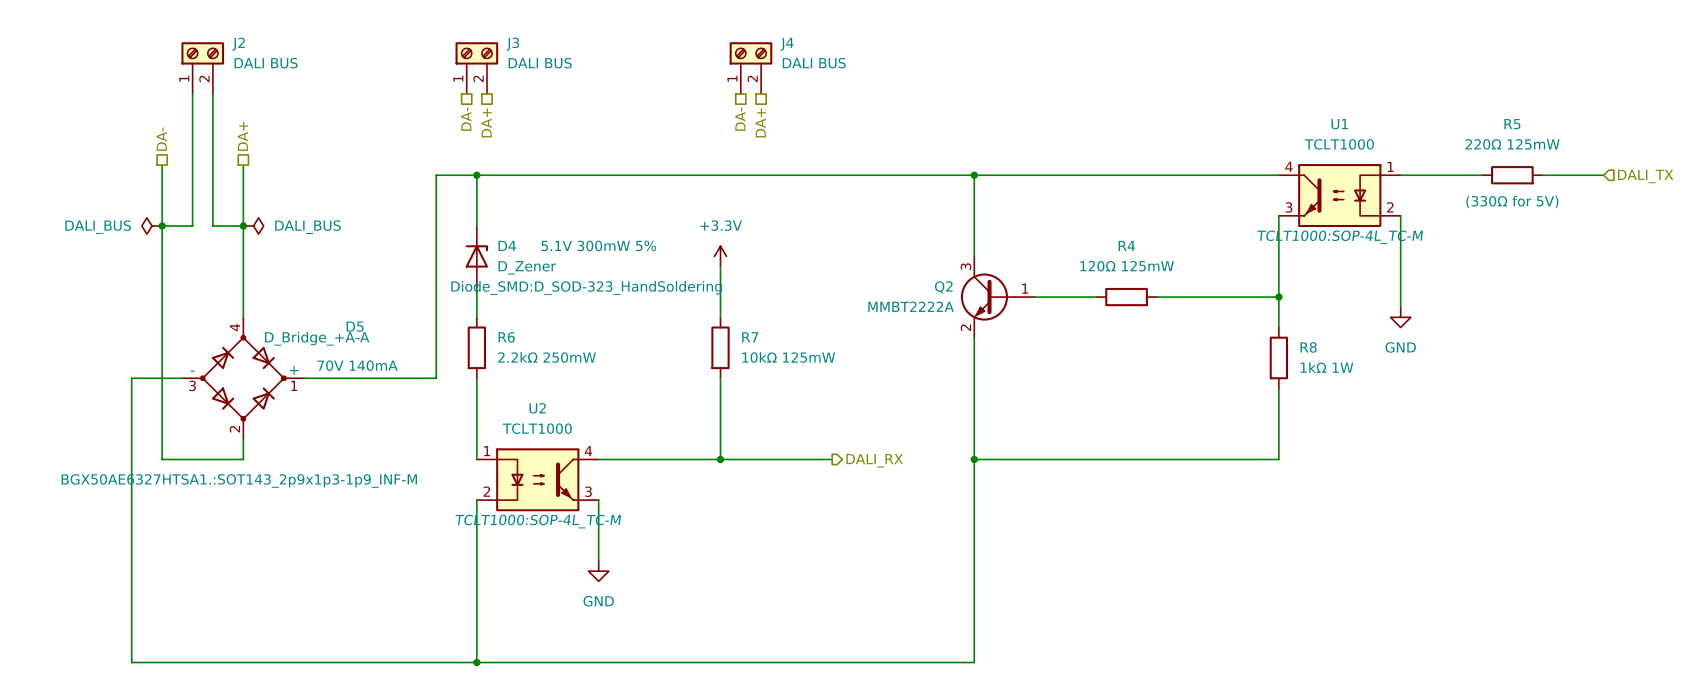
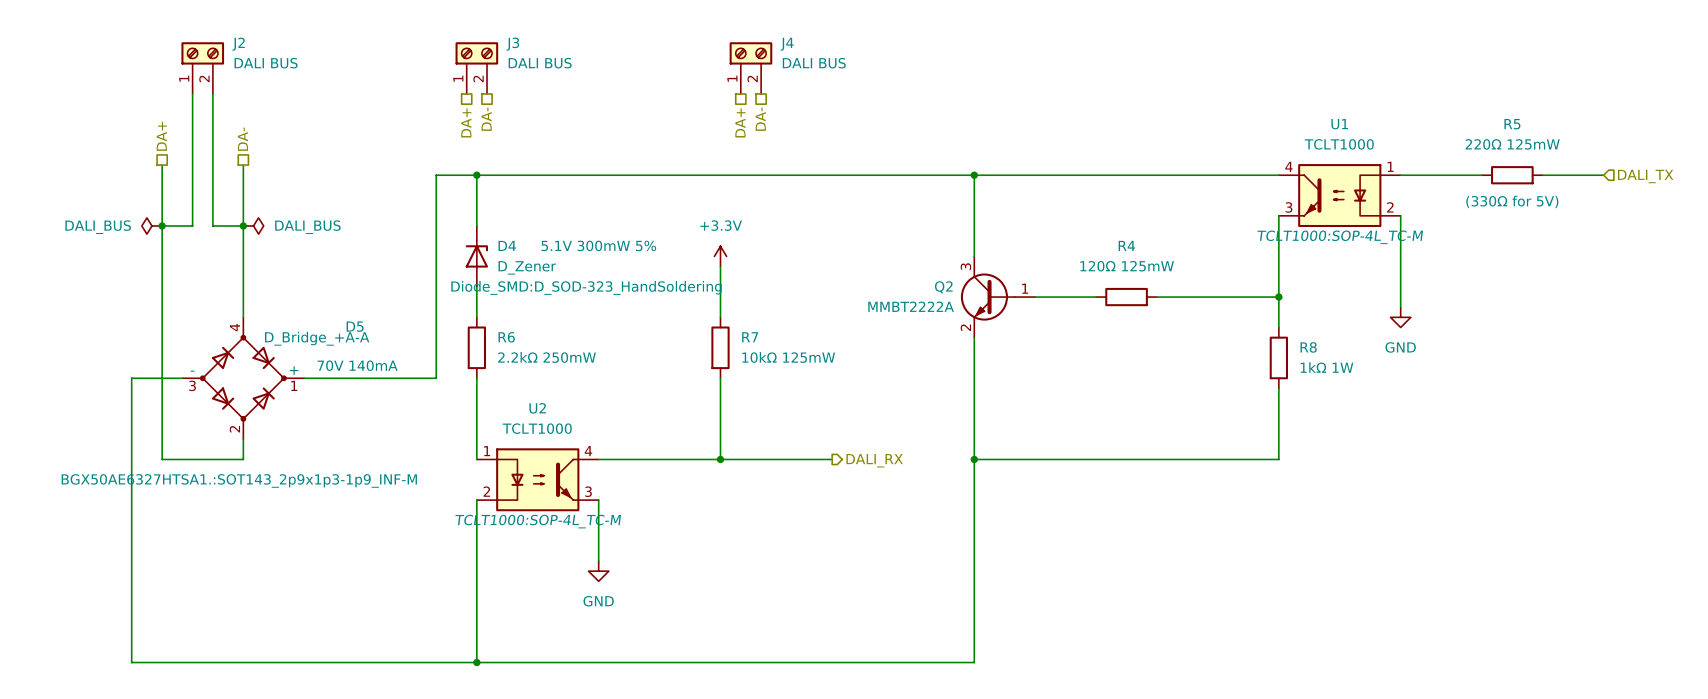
hierarchical label: DA- (466, 119) -> DA+ (466, 122)
hierarchical label: DA- (740, 119) -> DA+ (740, 122)
hierarchical label: DA+ (486, 122) -> DA- (486, 119)
hierarchical label: DA+ (760, 122) -> DA- (760, 119)
hierarchical label: DA+ (242, 136) -> DA- (242, 139)
hierarchical label: DA- (161, 139) -> DA+ (161, 136)

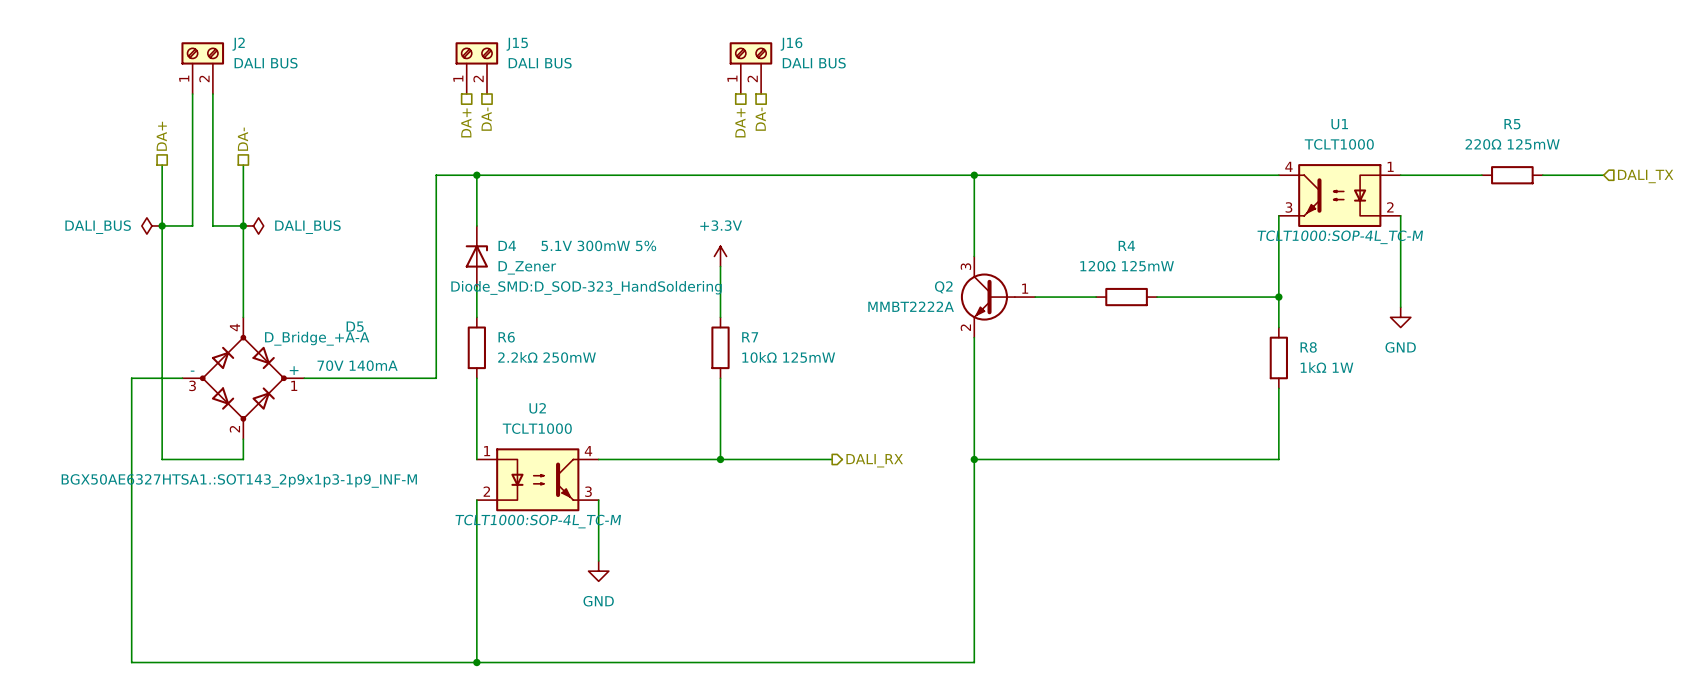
J3 name: J3 (512, 44) -> J15 (517, 44)
J4 name: J4 (787, 44) -> J16 (791, 44)
R5 text: (330Ω for 5V) (1512, 201) -> none

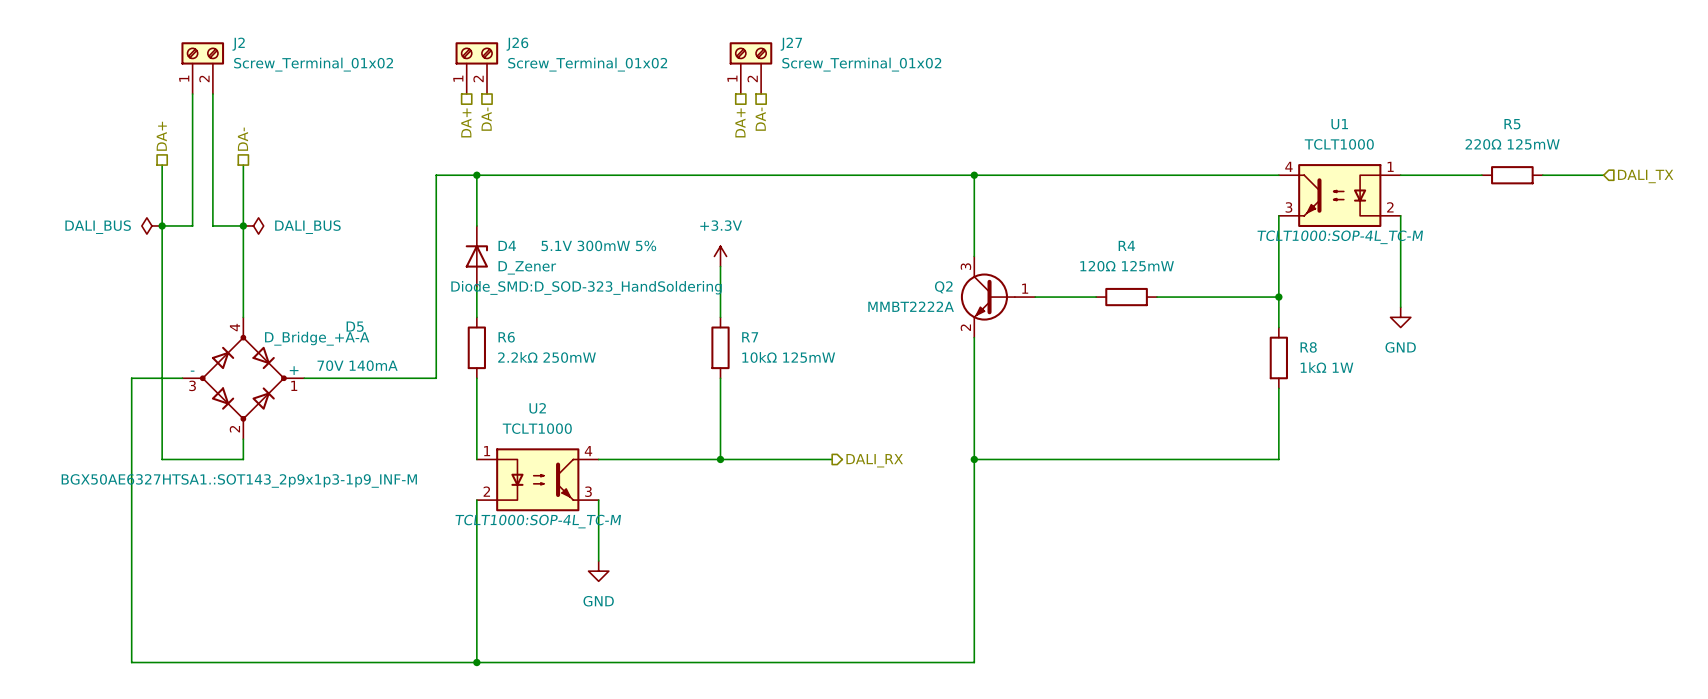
J15 name: J15 (517, 44) -> J26 (517, 44)
J16 name: J16 (791, 44) -> J27 (791, 44)
J2 value: DALI BUS (266, 63) -> Screw_Terminal_01x02 (313, 64)
J15 value: DALI BUS (540, 63) -> Screw_Terminal_01x02 (587, 64)
J16 value: DALI BUS (814, 63) -> Screw_Terminal_01x02 (861, 64)

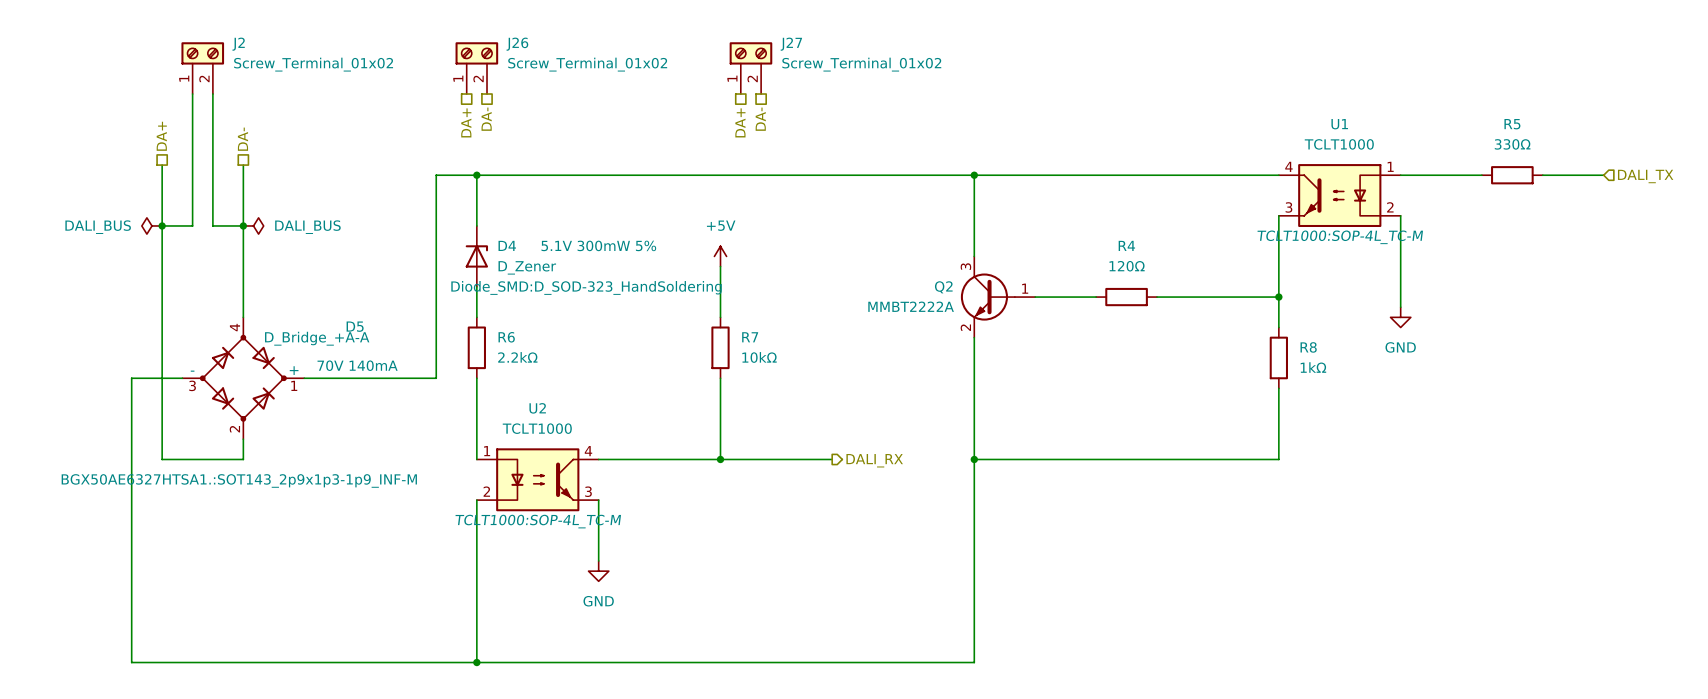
R5 value: 220Ω 125mW (1512, 144) -> 330Ω (1512, 144)
power symbol: +3.3V (720, 256) -> +5V (720, 256)
R4 value: 120Ω 125mW (1127, 266) -> 120Ω (1127, 266)
R6 value: 2.2kΩ 250mW (547, 357) -> 2.2kΩ (517, 357)
R7 value: 10kΩ 125mW (788, 357) -> 10kΩ (759, 357)
R8 value: 1kΩ 1W (1327, 367) -> 1kΩ (1313, 367)

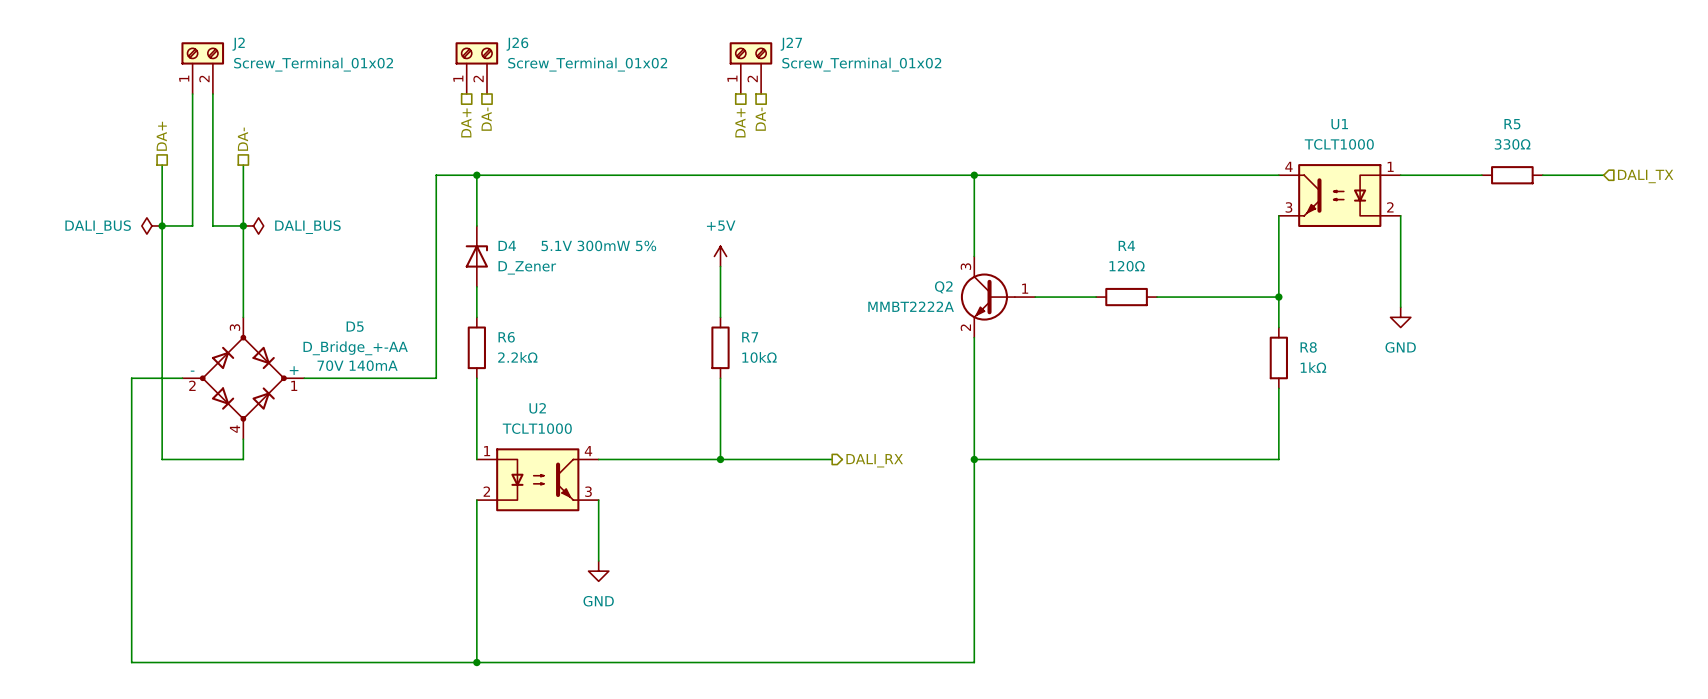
U1 text: TCLT1000:SOP-4L_TC-M (1340, 237) -> none
D4 text: Diode_SMD:D_SOD-323_HandSoldering (586, 287) -> none
D5 pin number: 4 (234, 327) -> 3 (234, 327)
D5 value: D_Bridge_+A-A (317, 338) -> D_Bridge_+-AA (355, 348)
D5 pin number: 3 (192, 385) -> 2 (192, 385)
D5 pin number: 2 (234, 429) -> 4 (234, 429)
D5 text: BGX50AE6327HTSA1.:SOT143_2p9x1p3-1p9_INF-M (239, 480) -> none
U2 text: TCLT1000:SOP-4L_TC-M (538, 521) -> none

